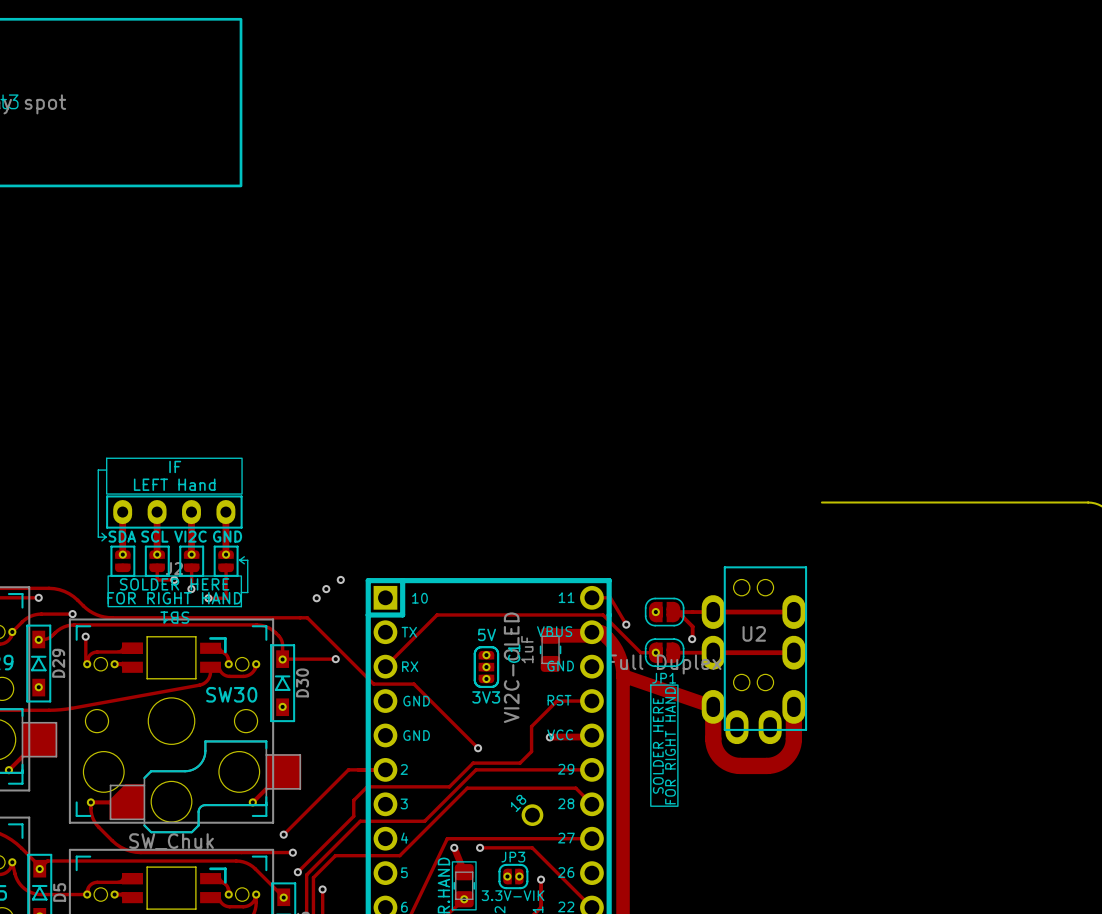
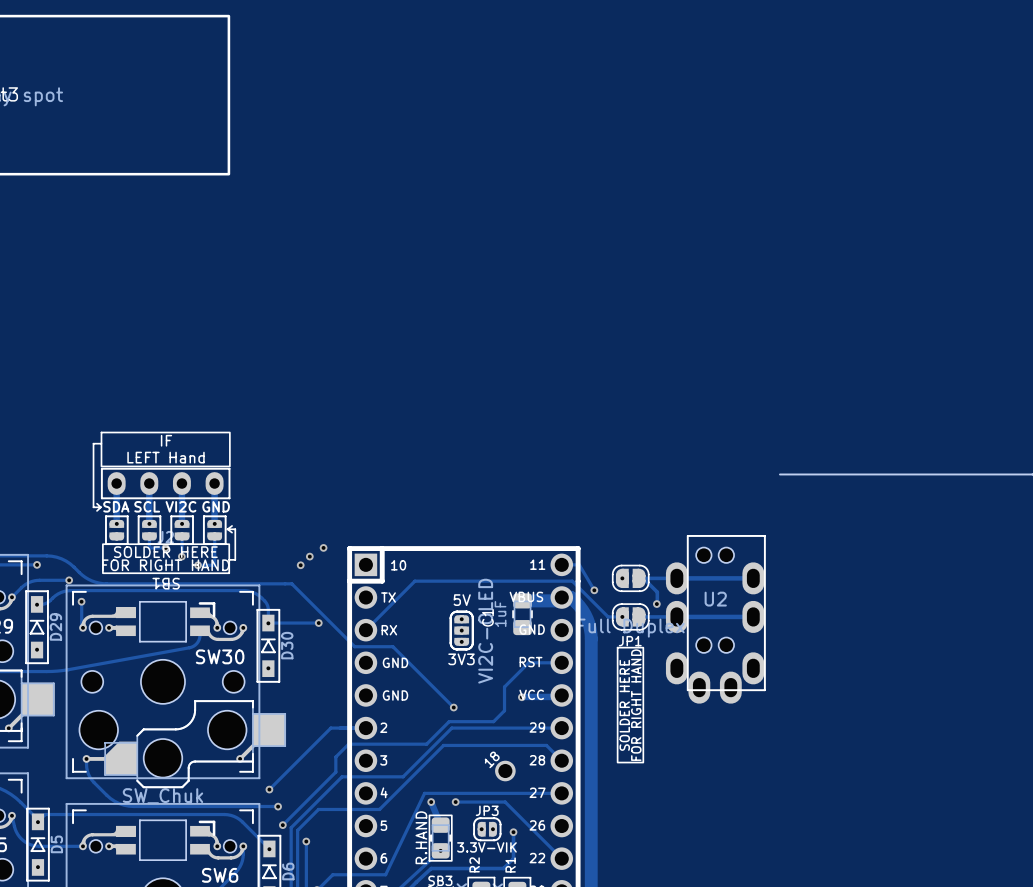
track: (623, 675) (713, 706) (713, 738) (715, 749) (723, 760) (736, 765) (769, 765) (778, 763) (785, 758) (791, 750) (793, 741) (793, 706) -> none

